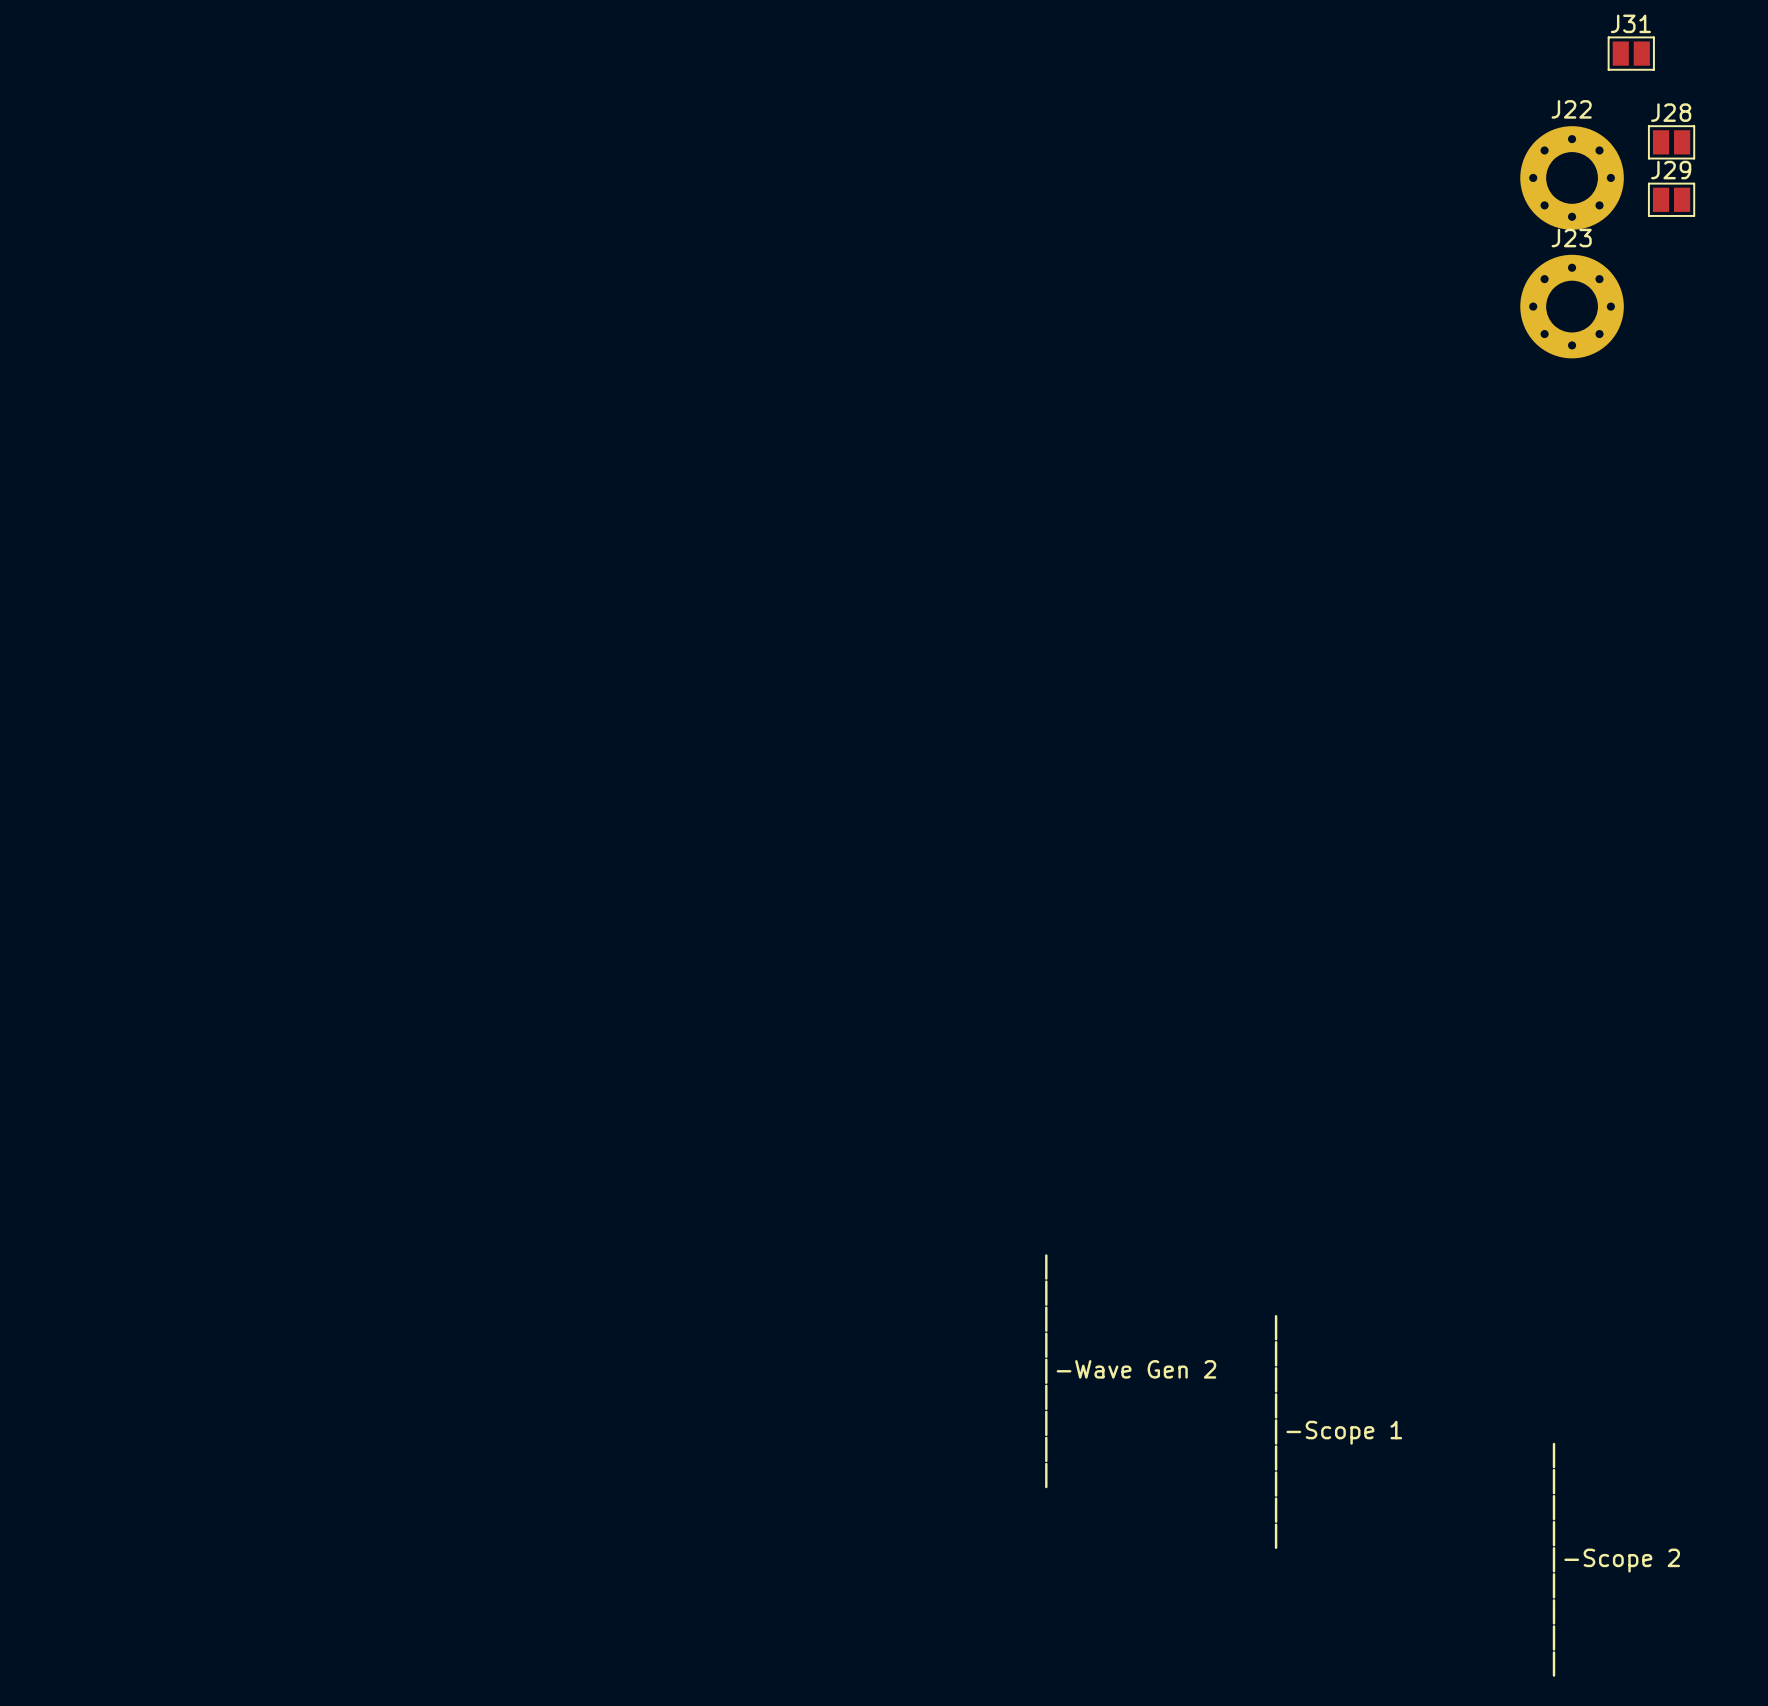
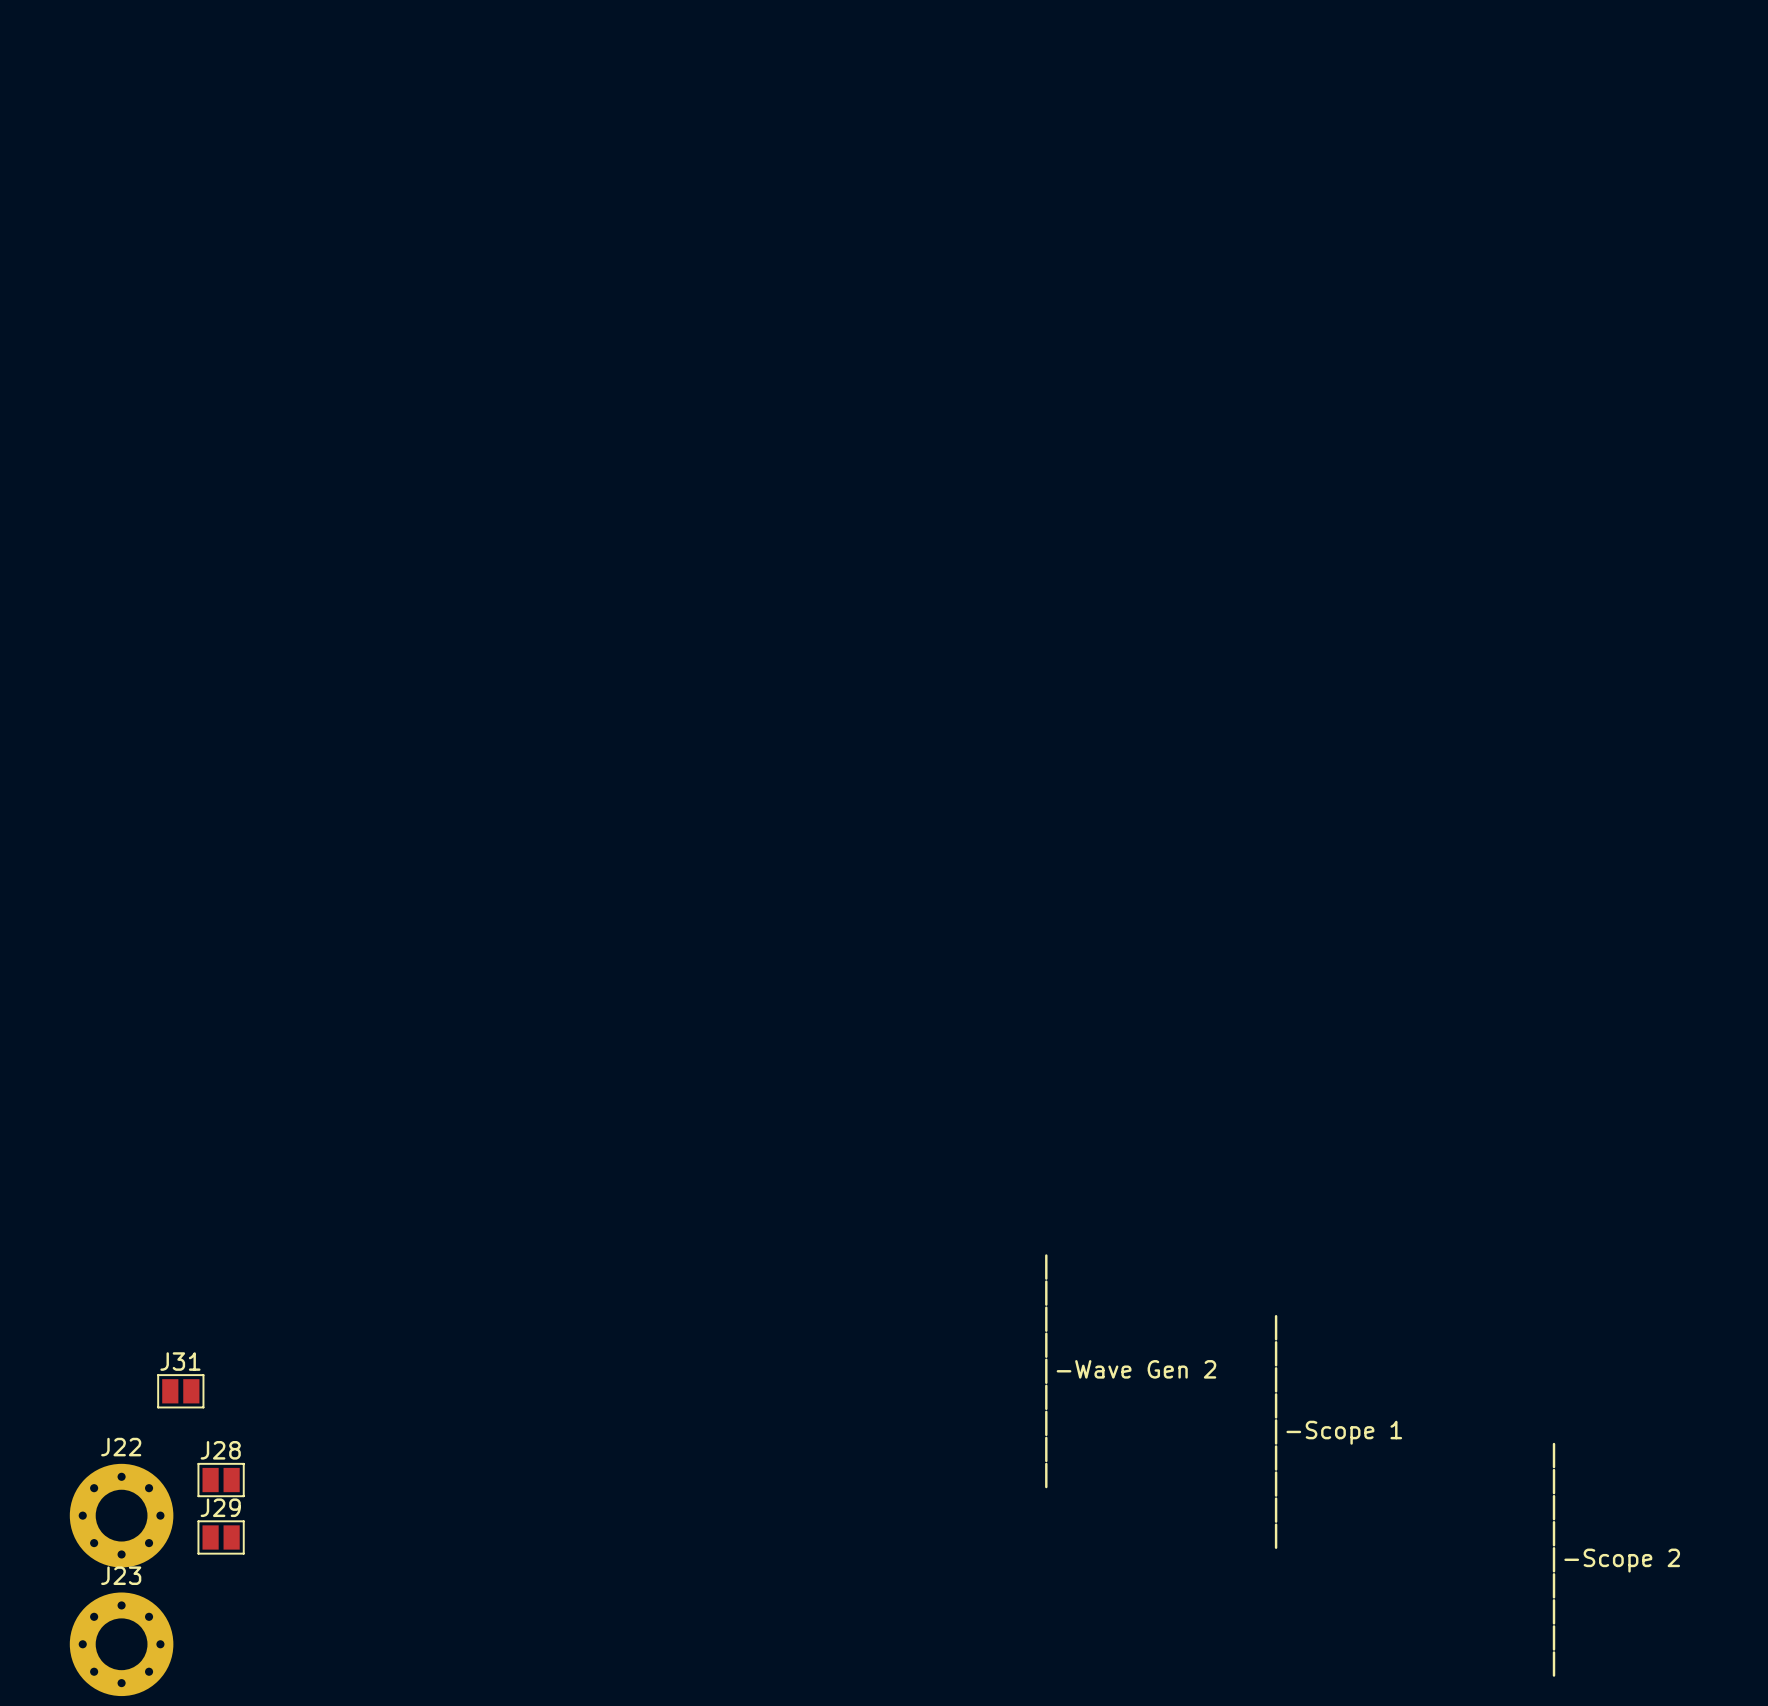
J31 position: (1631, 53) -> (180, 1391)
J28 position: (1671, 142) -> (221, 1480)
J22 position: (1572, 177) -> (121, 1515)
J29 position: (1671, 199) -> (221, 1537)
J23 position: (1572, 306) -> (121, 1644)

